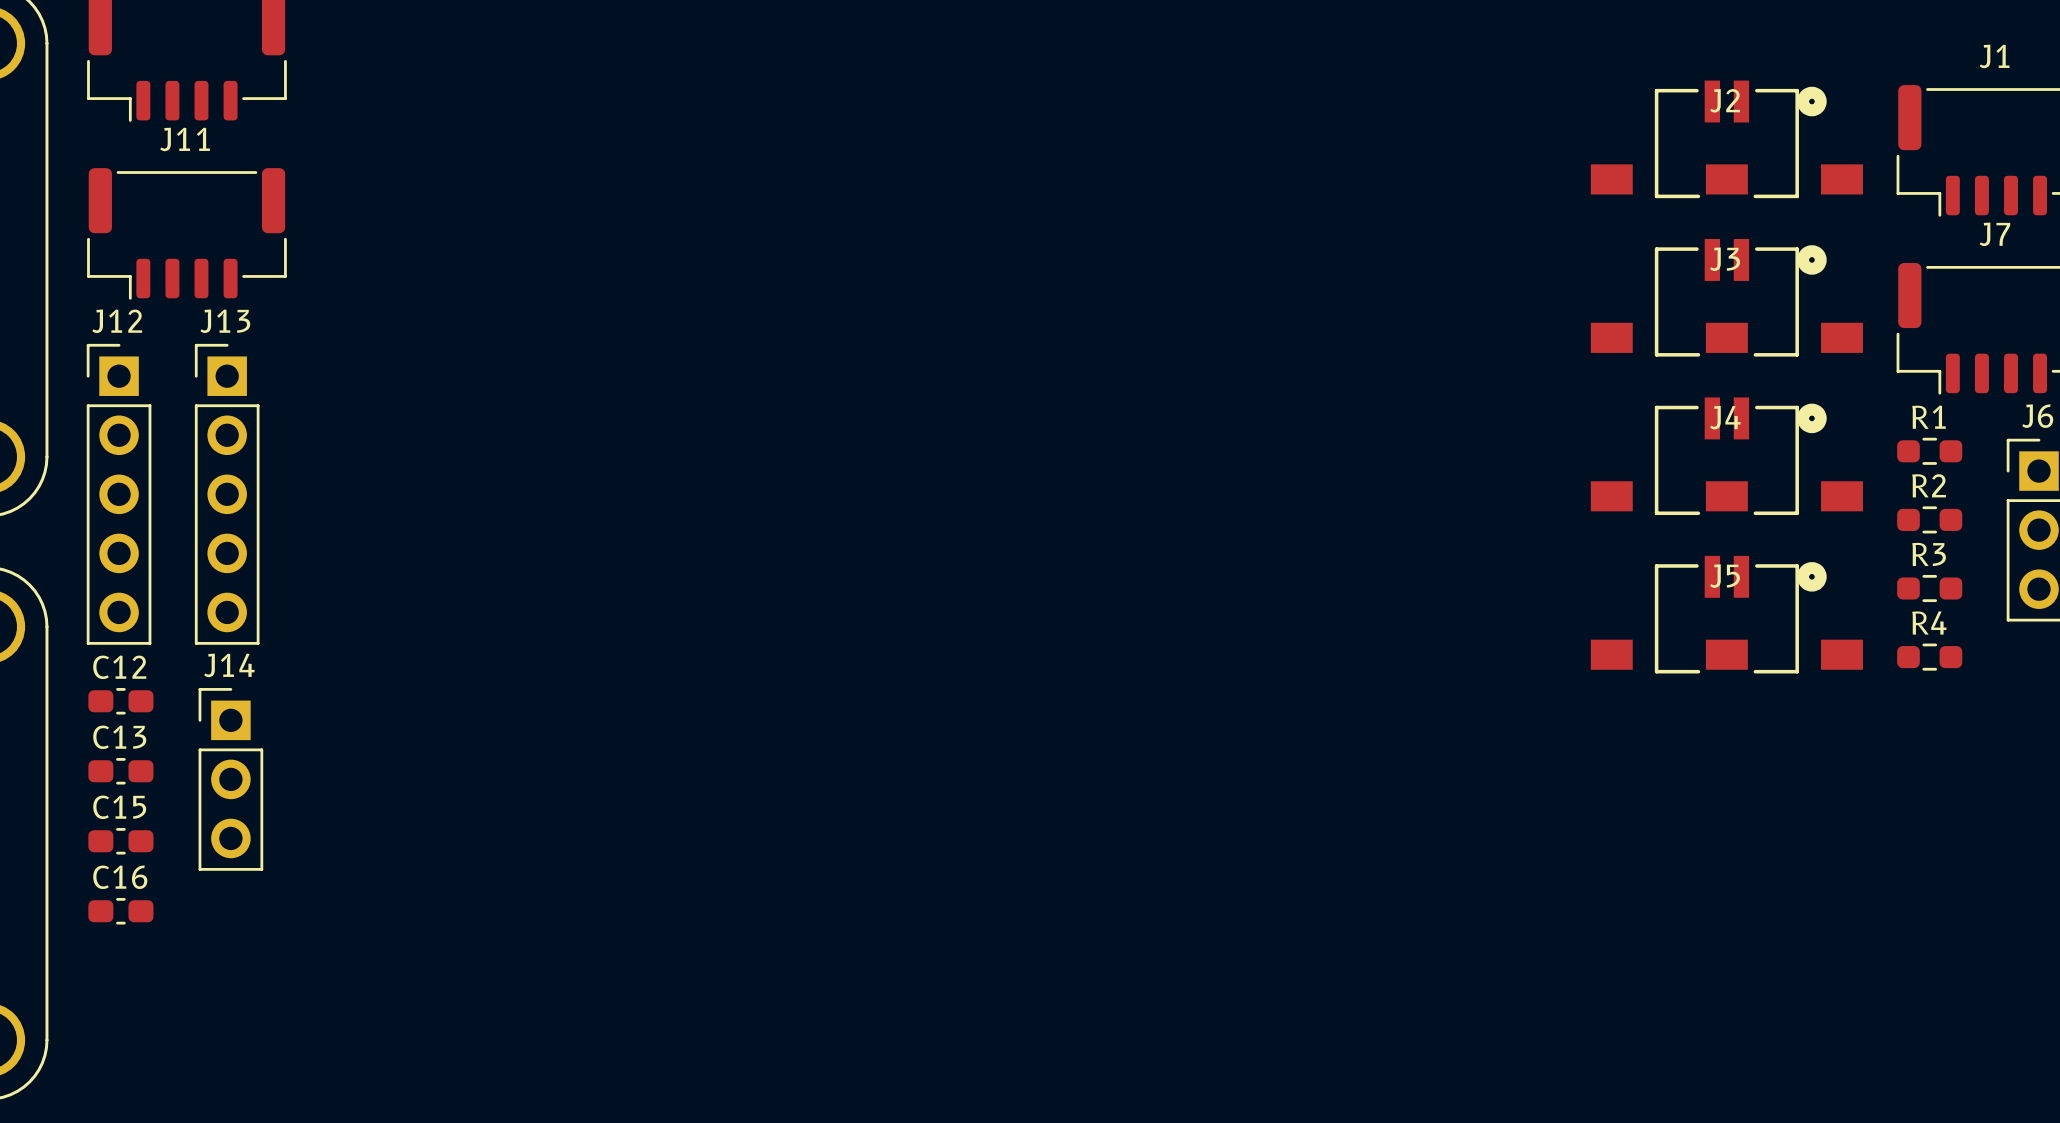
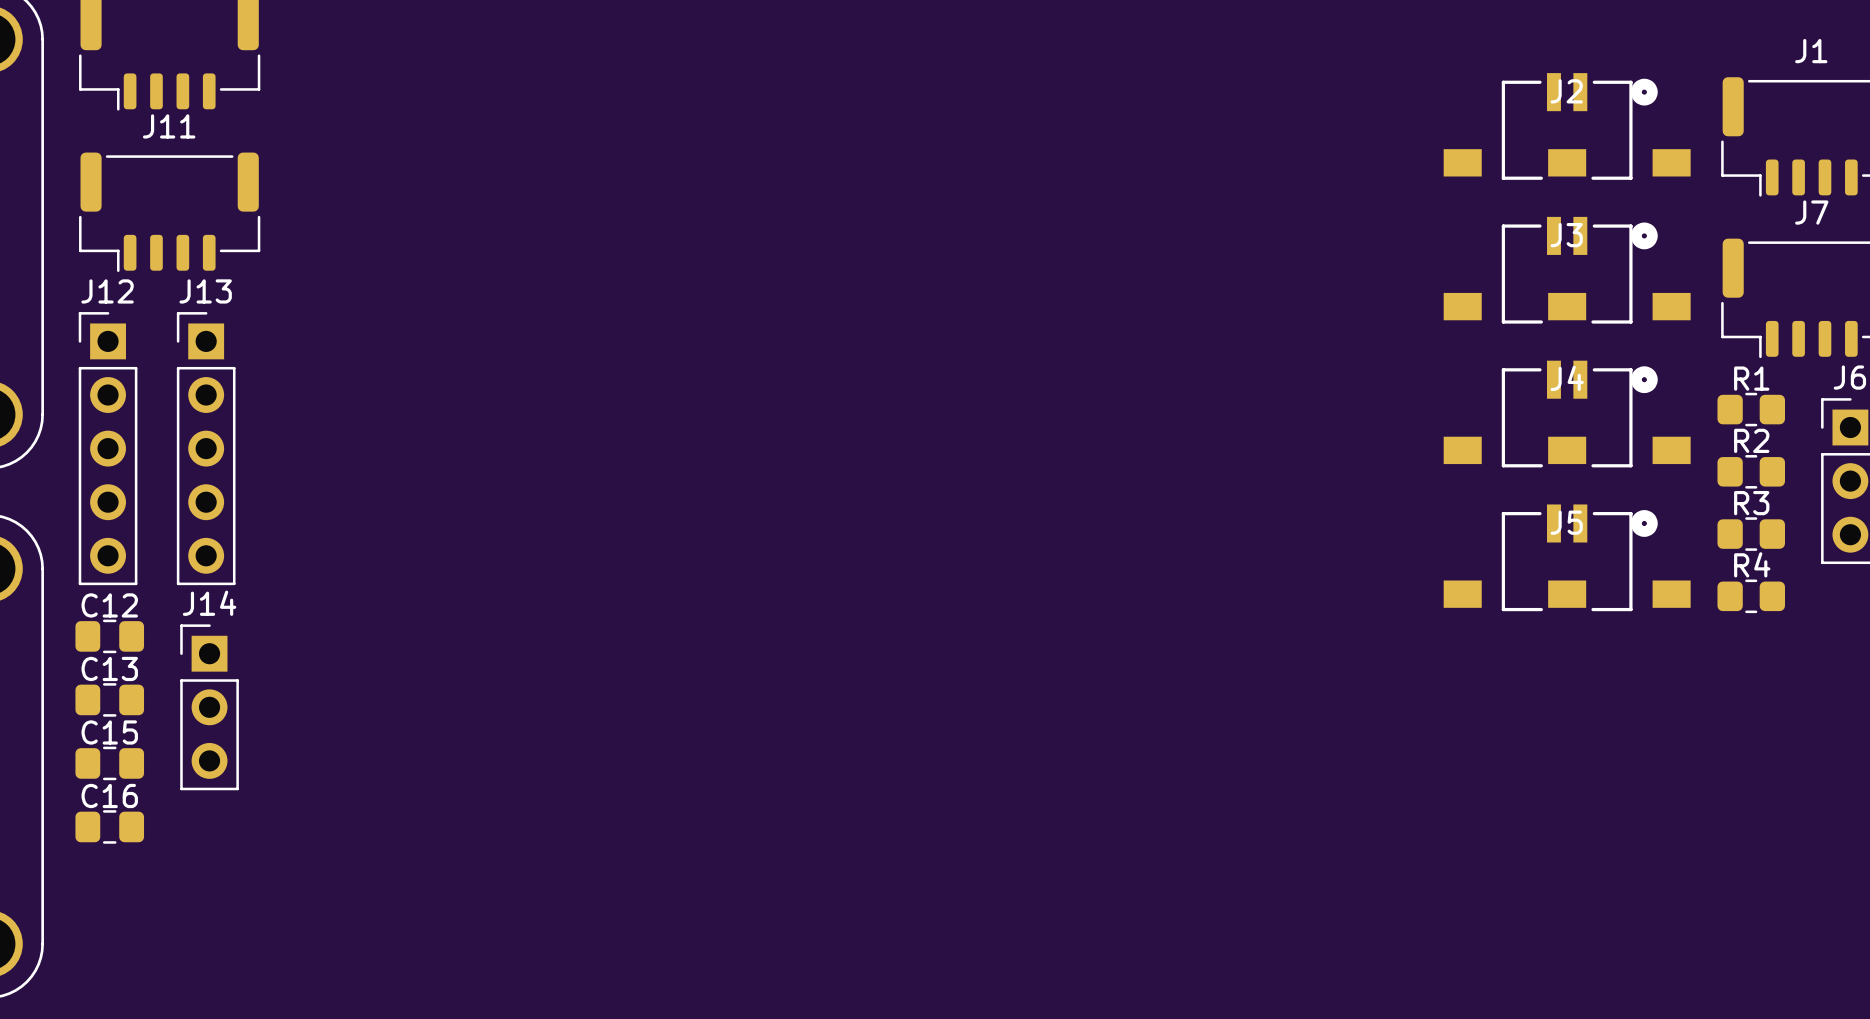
R1 footprint: [1897, 437, 1963, 465] -> [1717, 392, 1786, 427]
R2 footprint: [1897, 506, 1963, 534] -> [1717, 455, 1786, 489]
R3 footprint: [1897, 574, 1963, 603] -> [1717, 517, 1786, 551]
R4 footprint: [1897, 643, 1963, 671] -> [1717, 579, 1786, 614]
C12 footprint: [88, 688, 154, 715] -> [75, 619, 145, 654]
C13 footprint: [88, 758, 154, 785] -> [75, 683, 145, 717]
C15 footprint: [88, 828, 154, 855] -> [75, 746, 145, 781]
C16 footprint: [88, 897, 154, 925] -> [75, 810, 145, 844]

